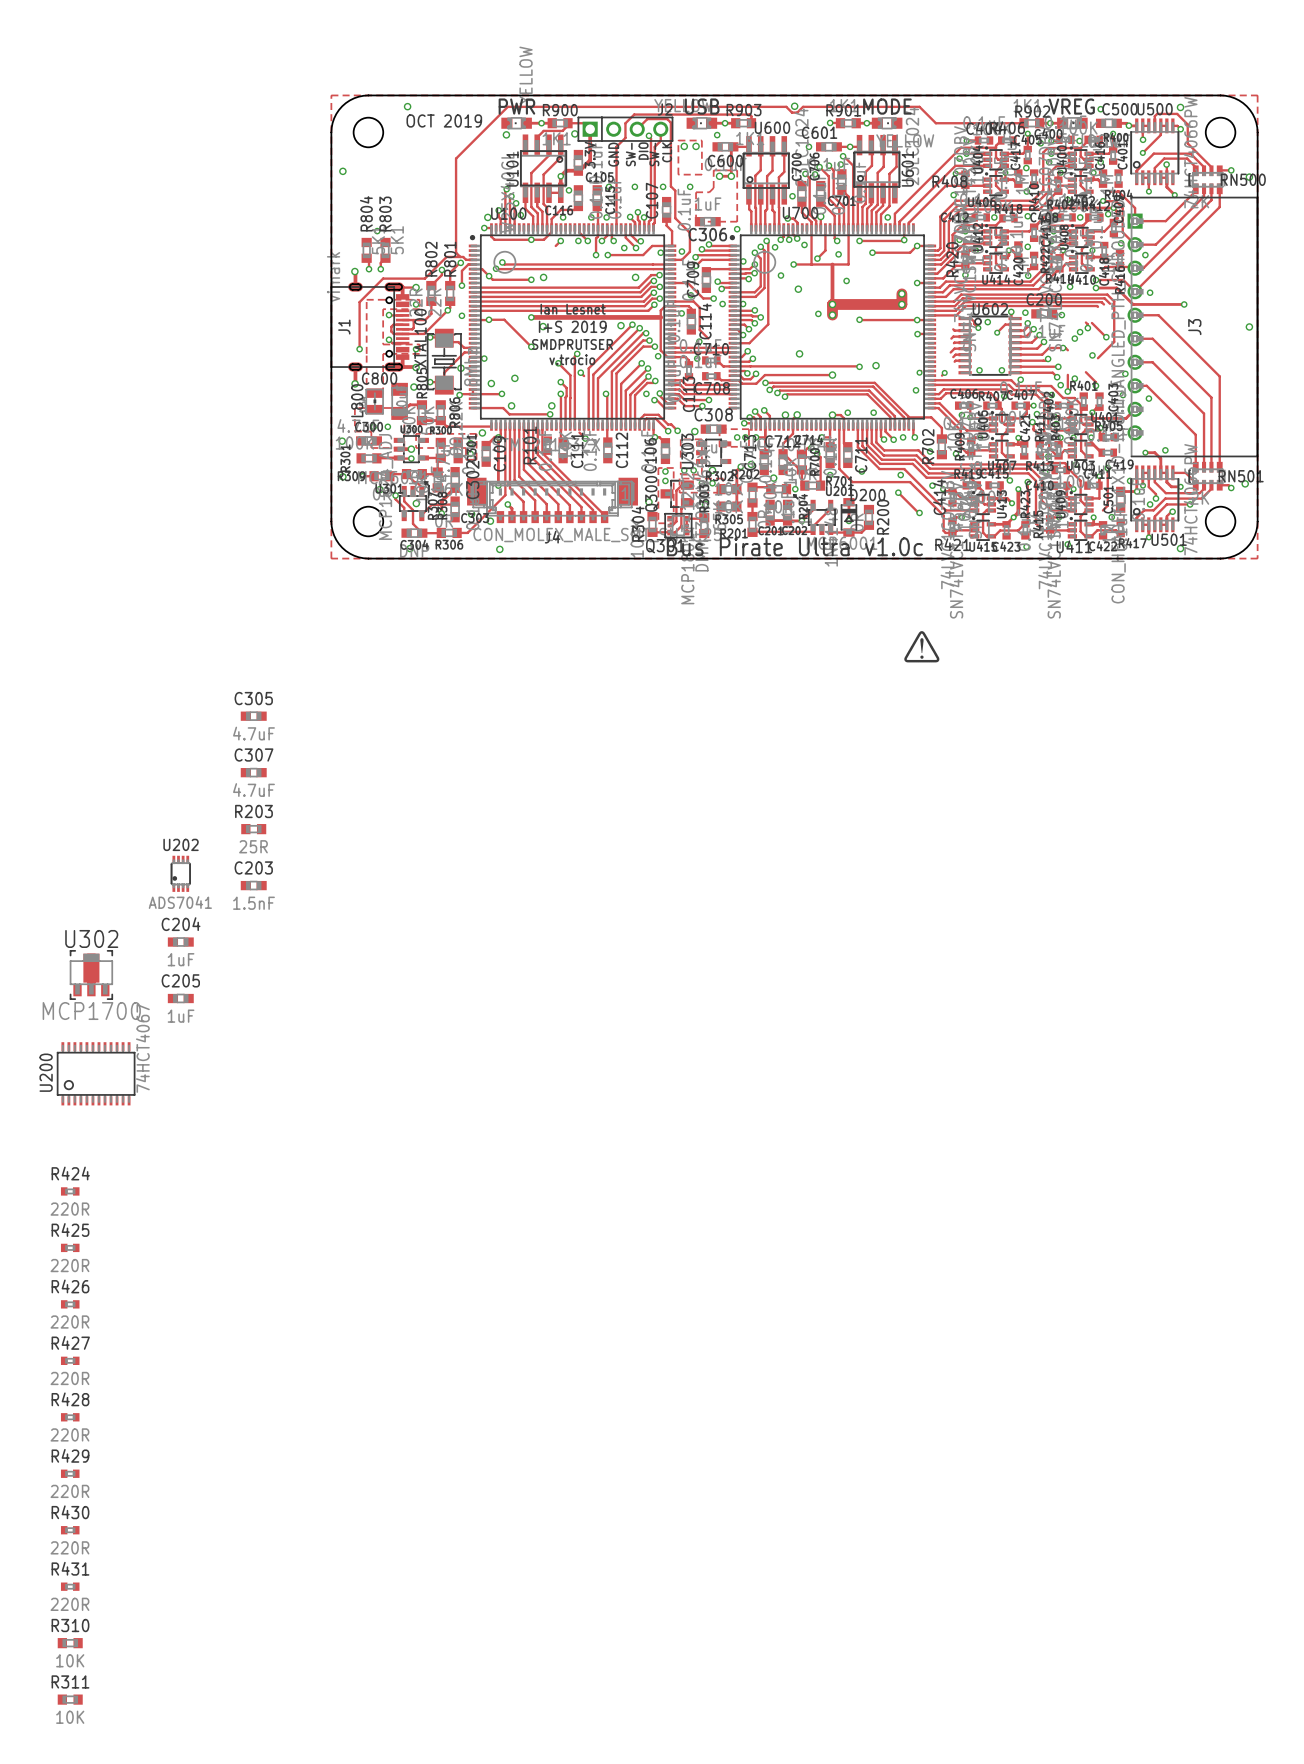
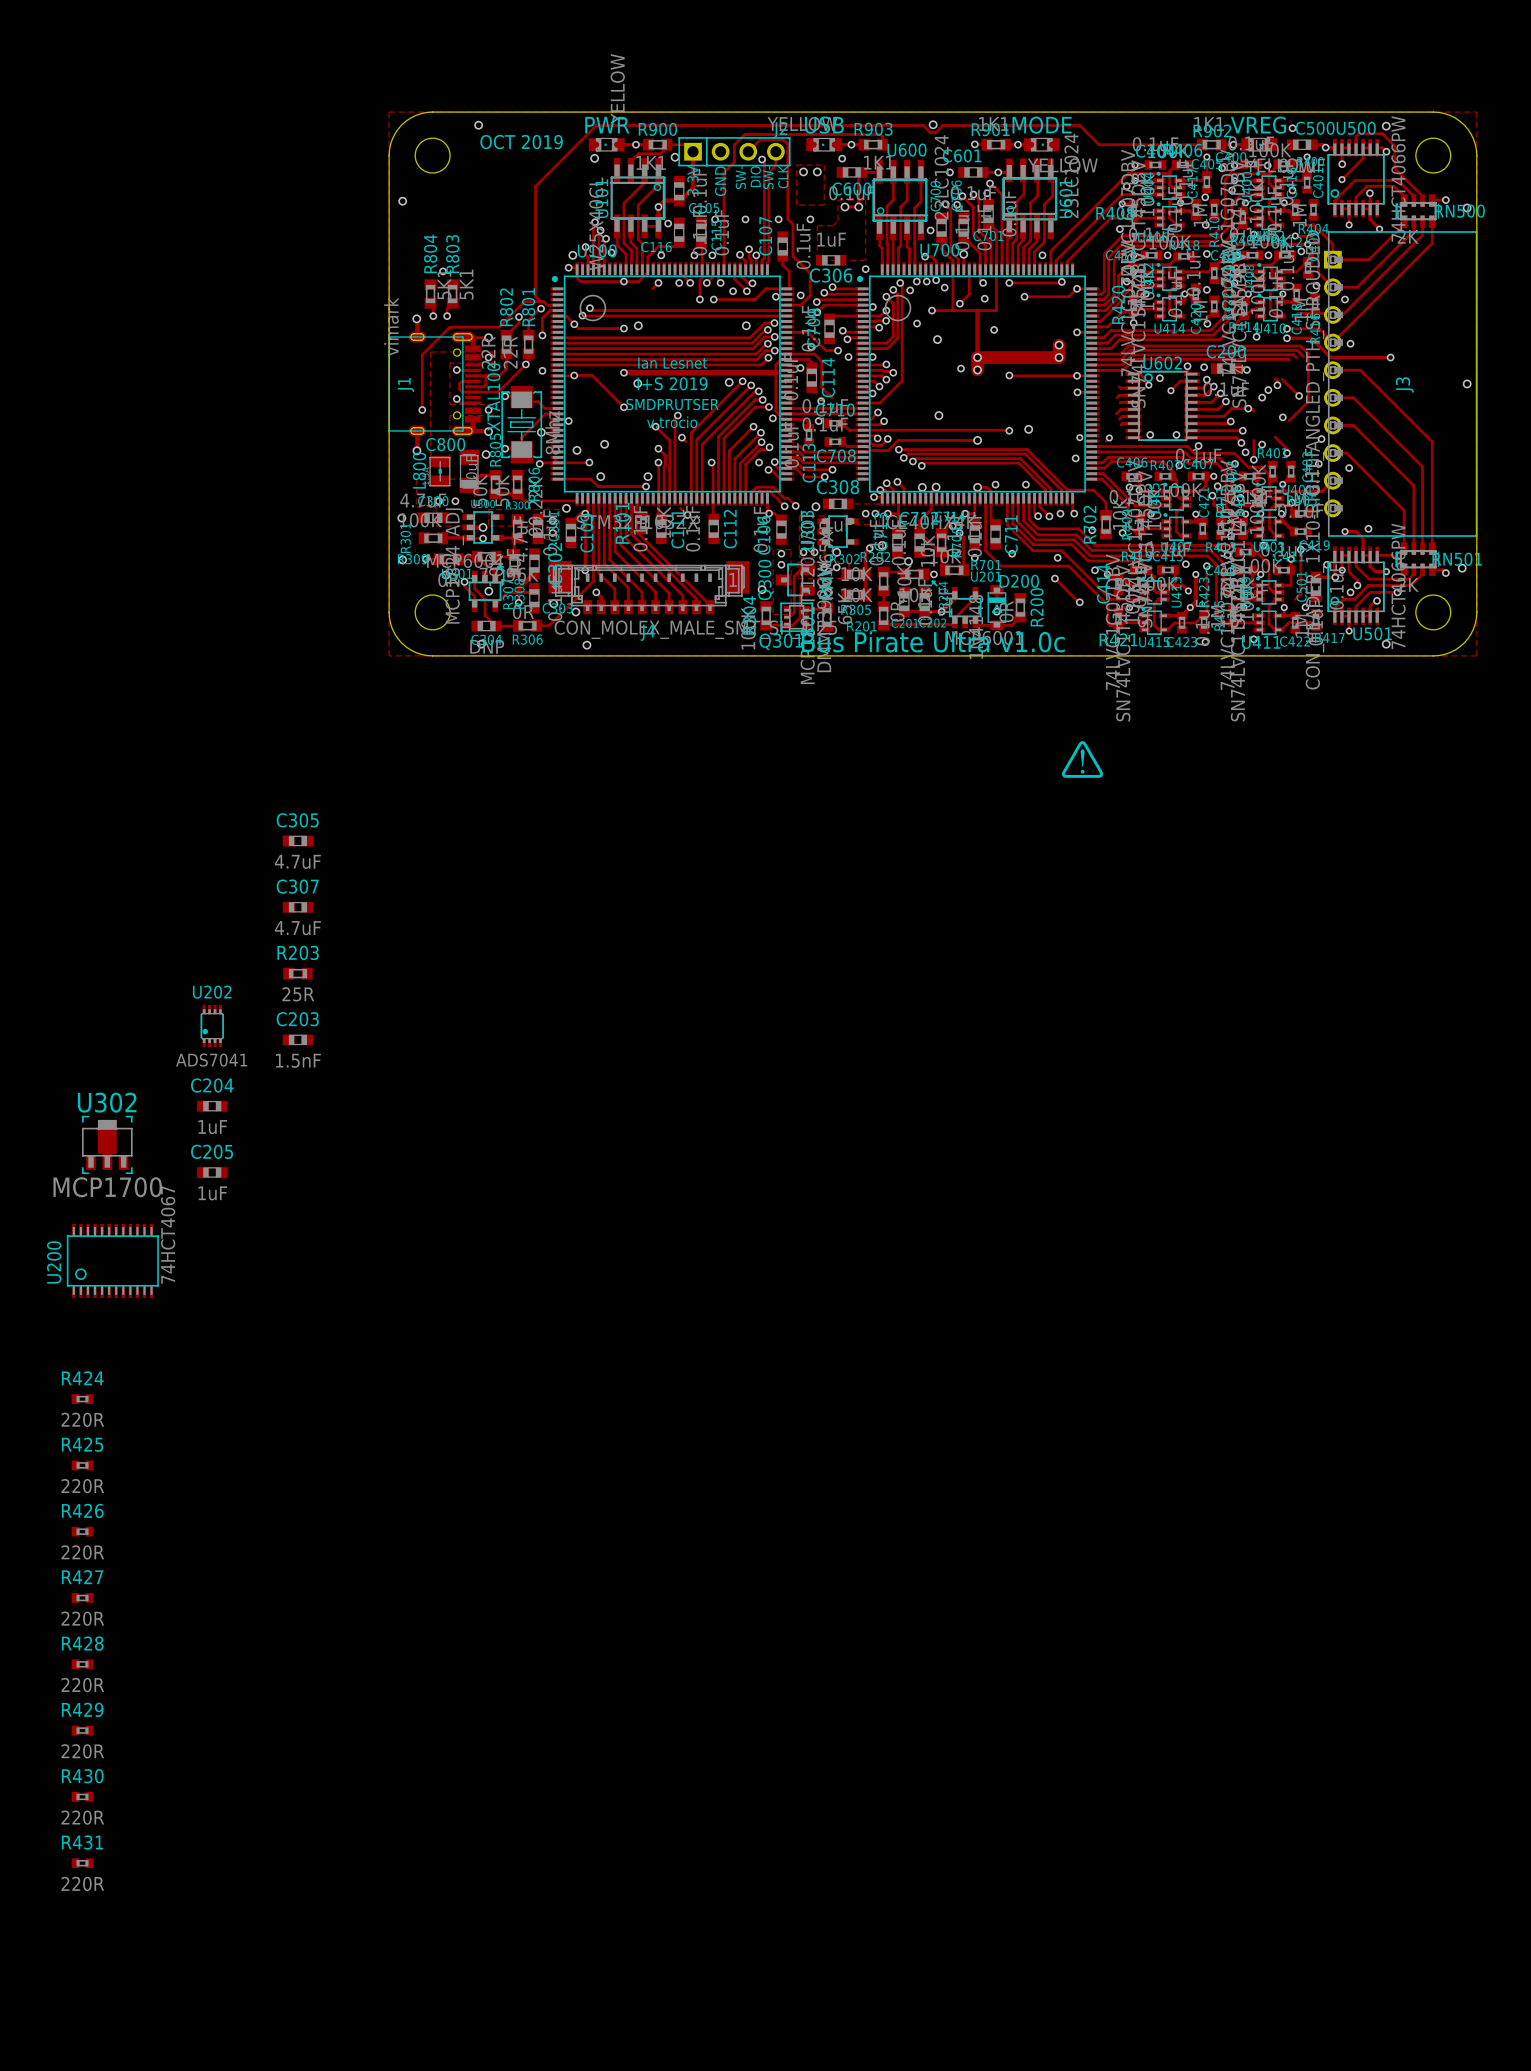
R310: 10K (70, 1643) -> none
R311: 10K (70, 1699) -> none

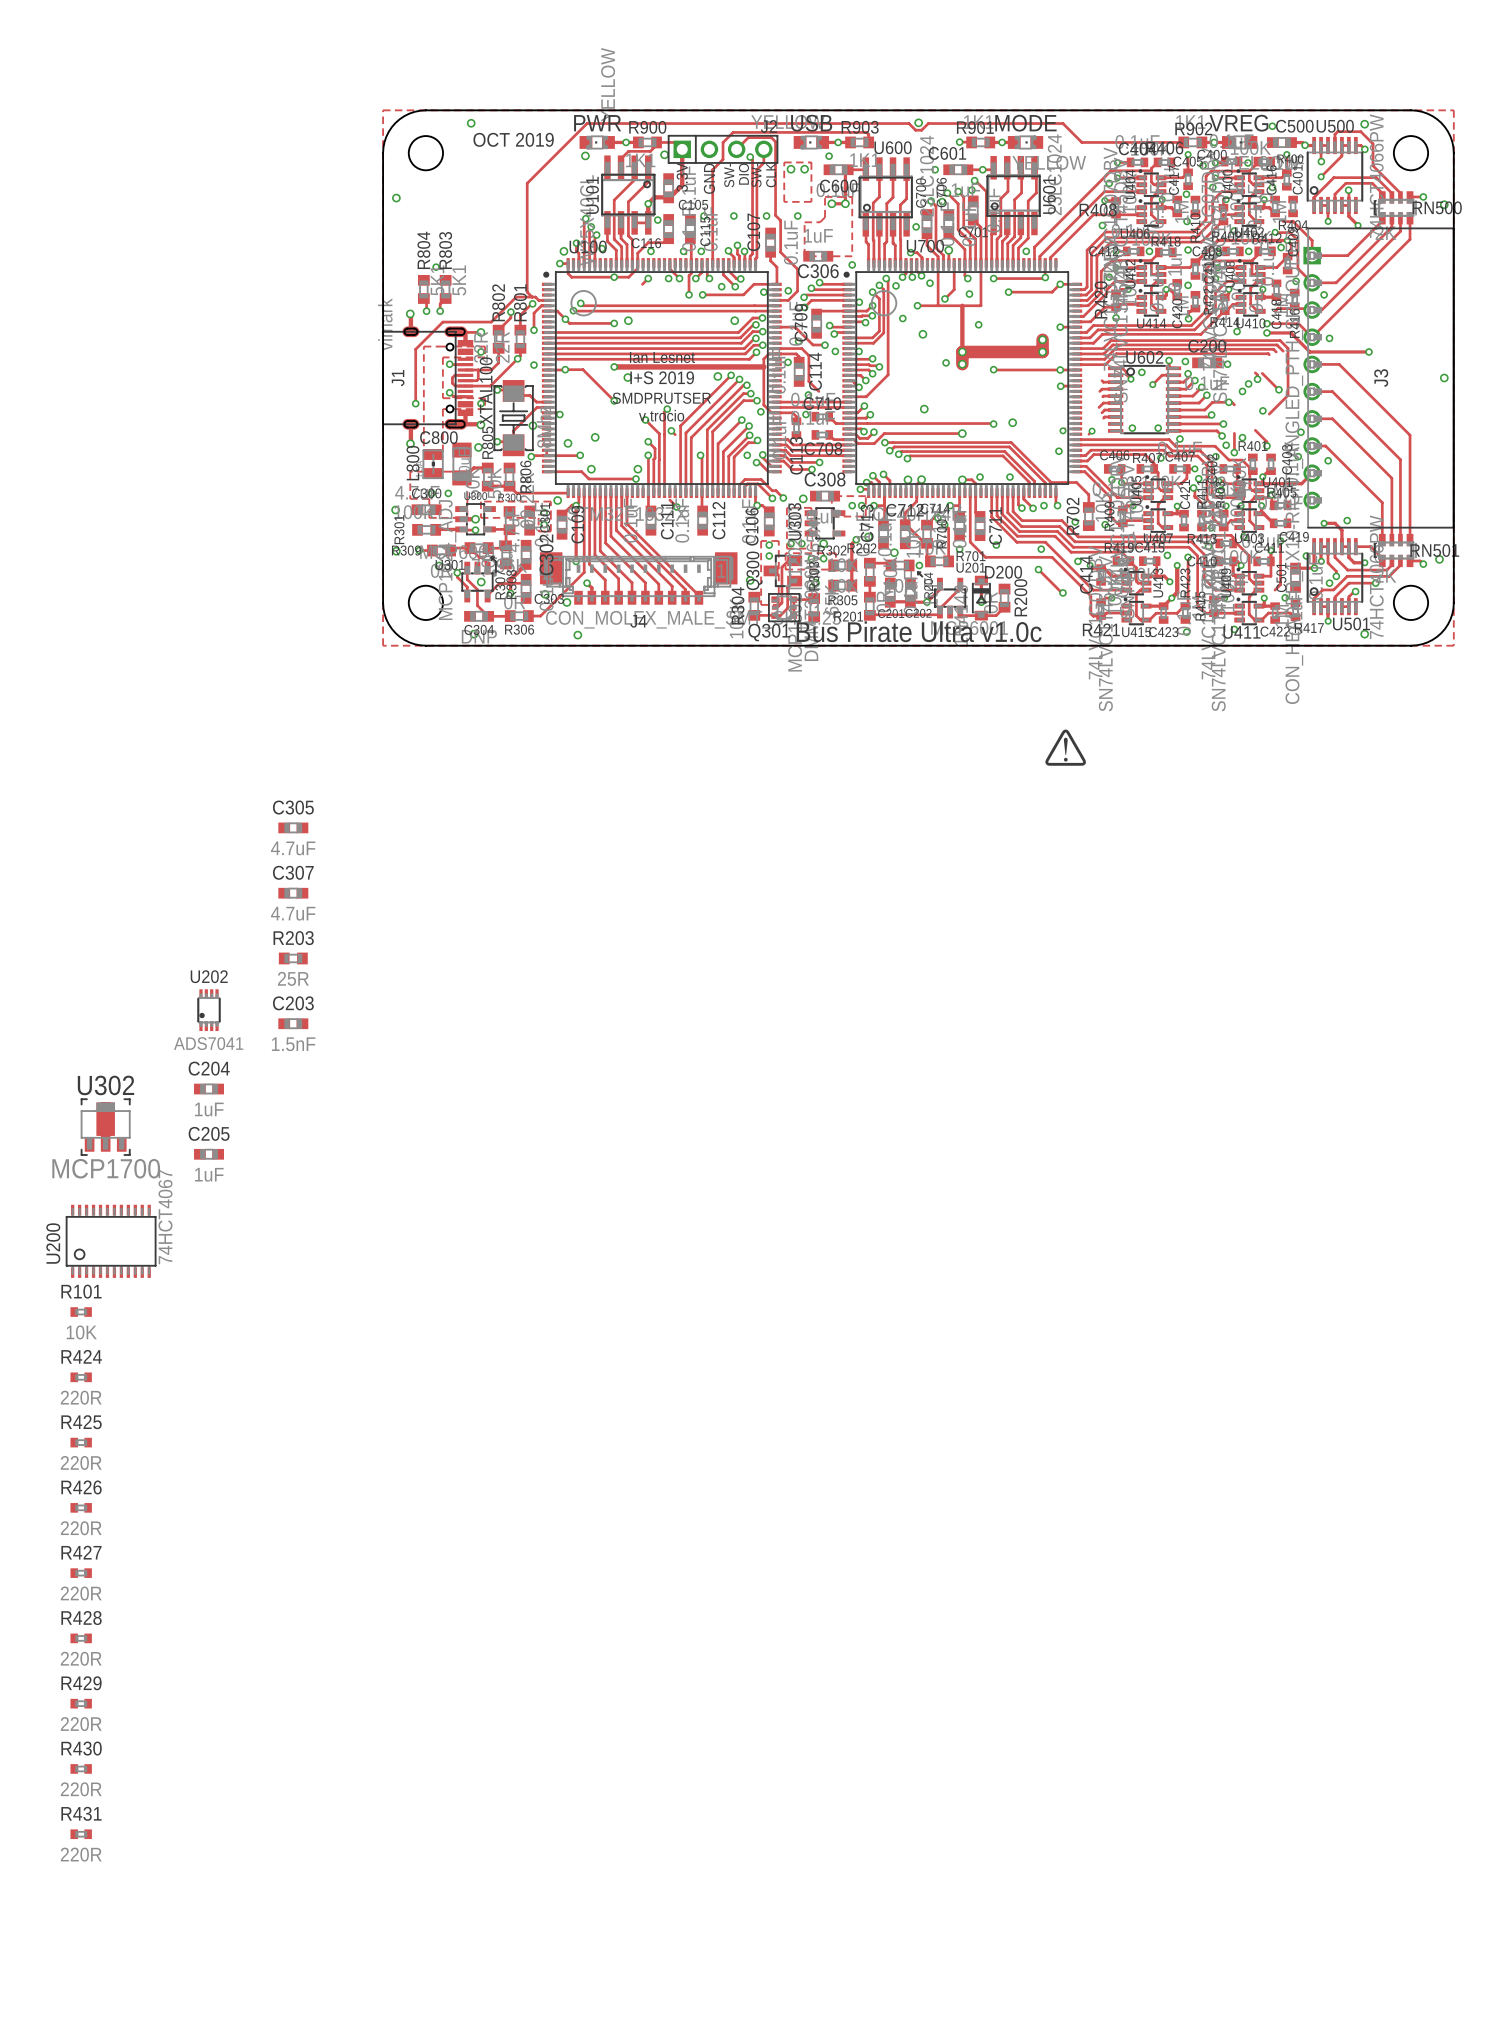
R101 rotation: 0° (643, 523) -> 90° clockwise (81, 1312)
R101 position: (643, 523) -> (81, 1312)

